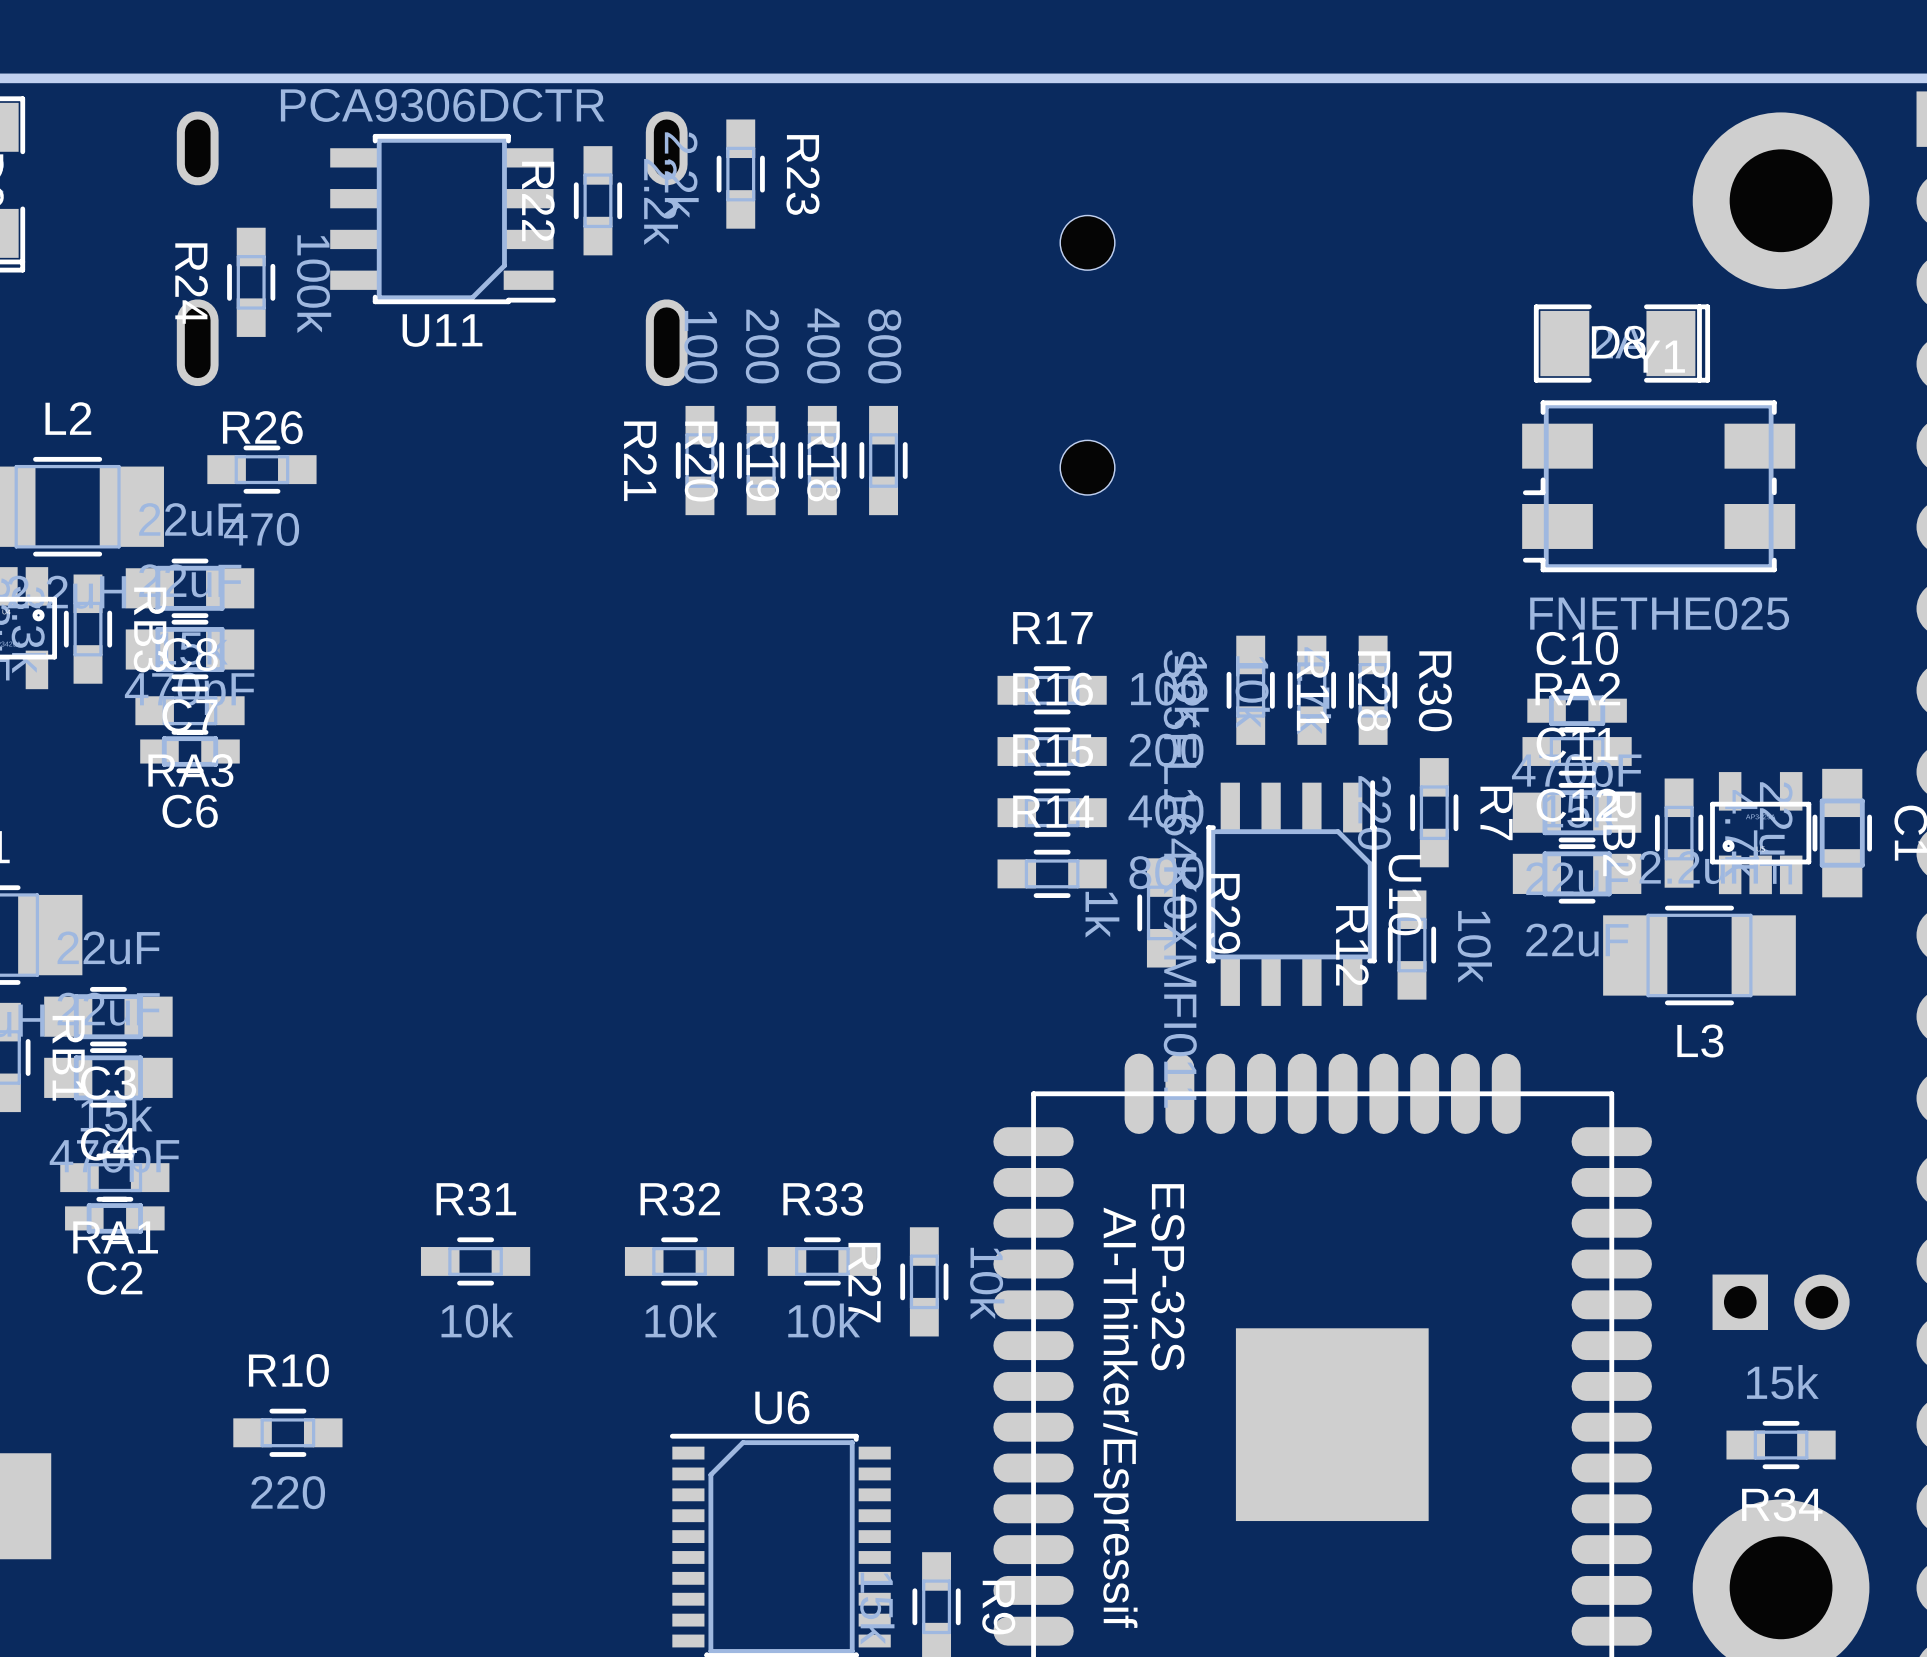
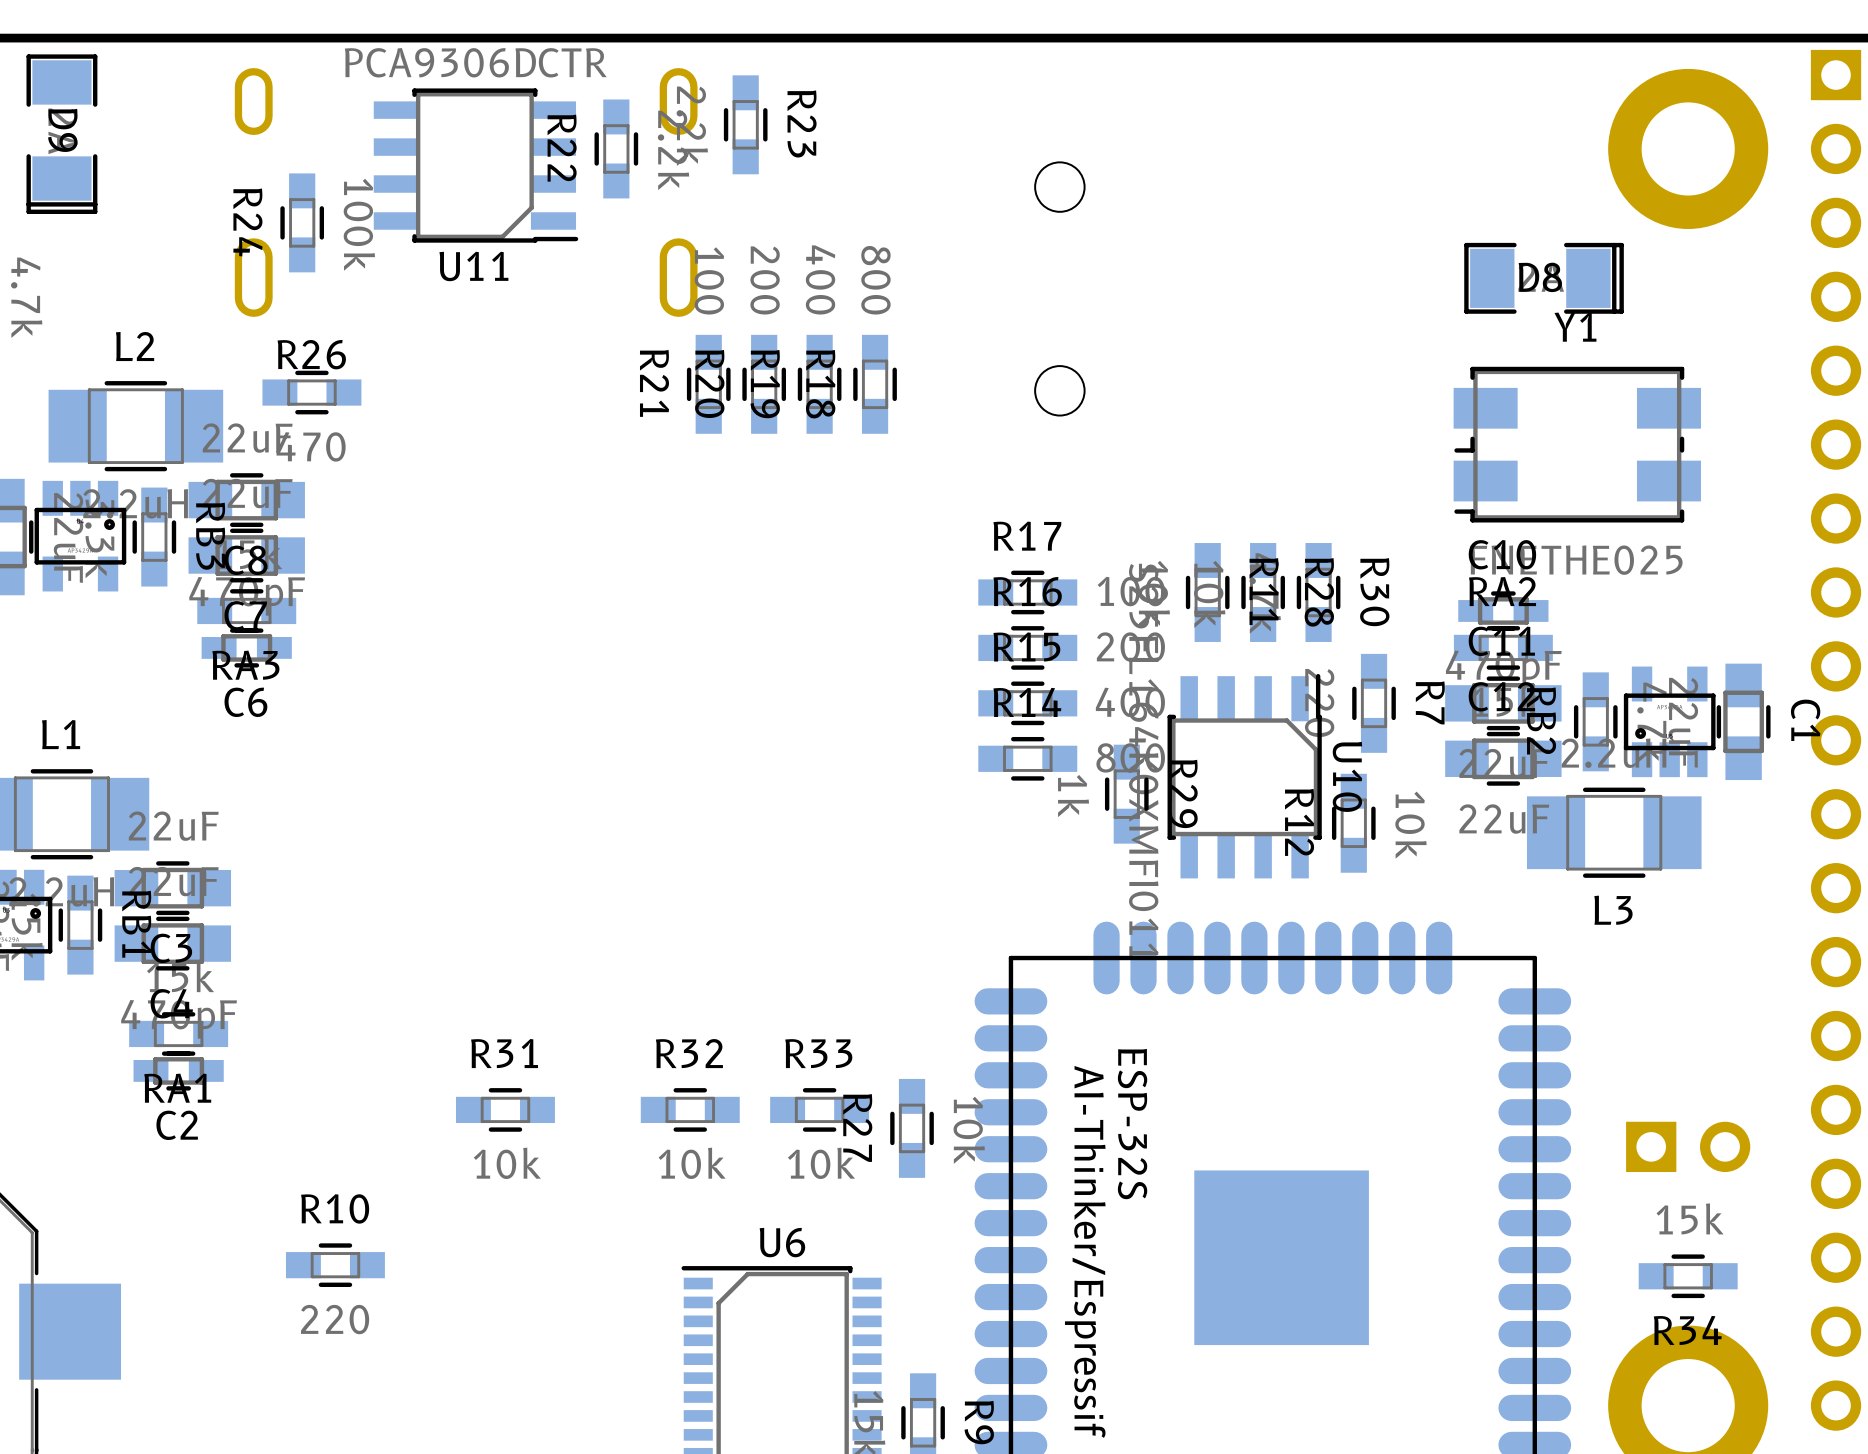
Y1 position: (1658, 486) -> (1577, 444)

